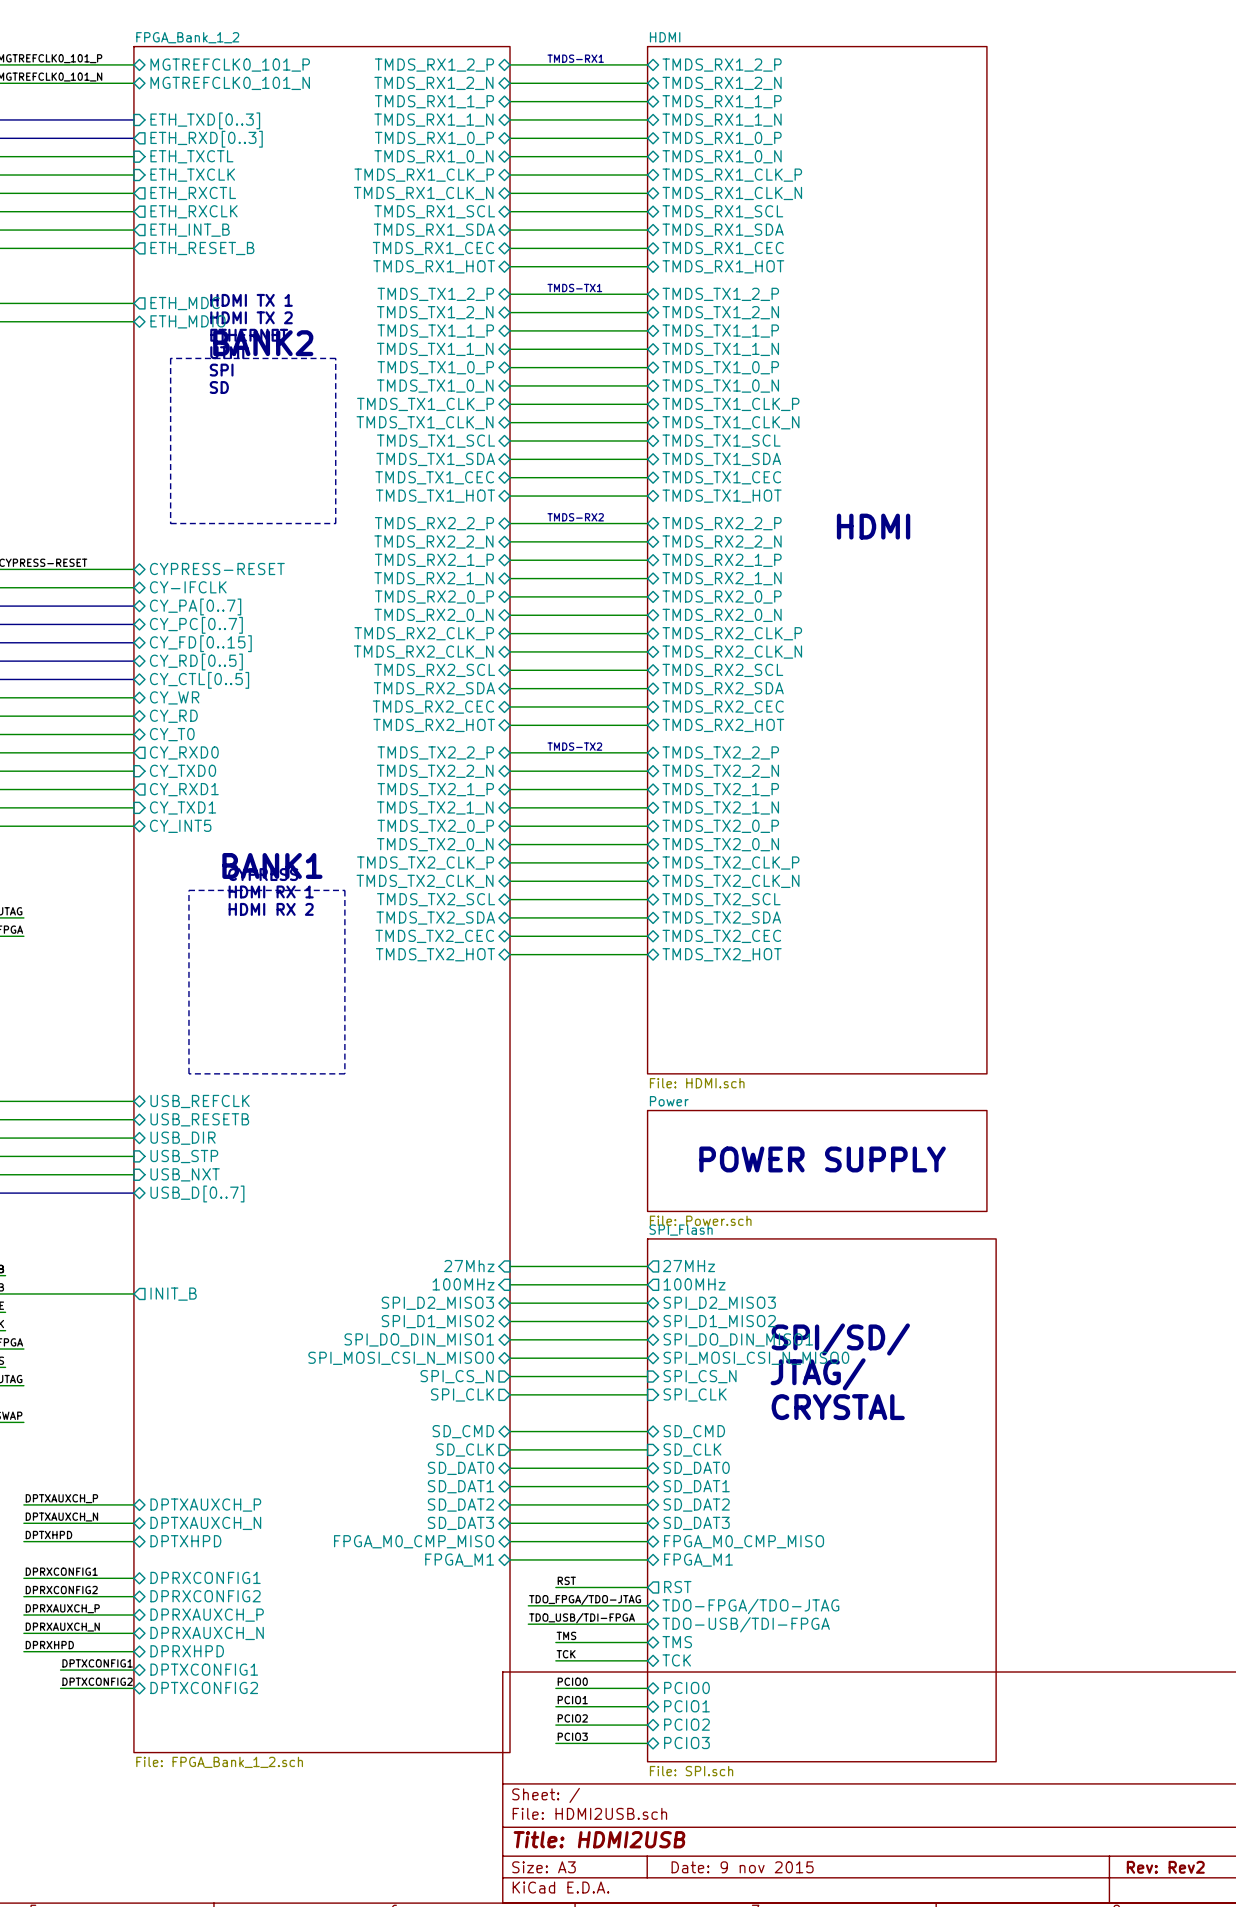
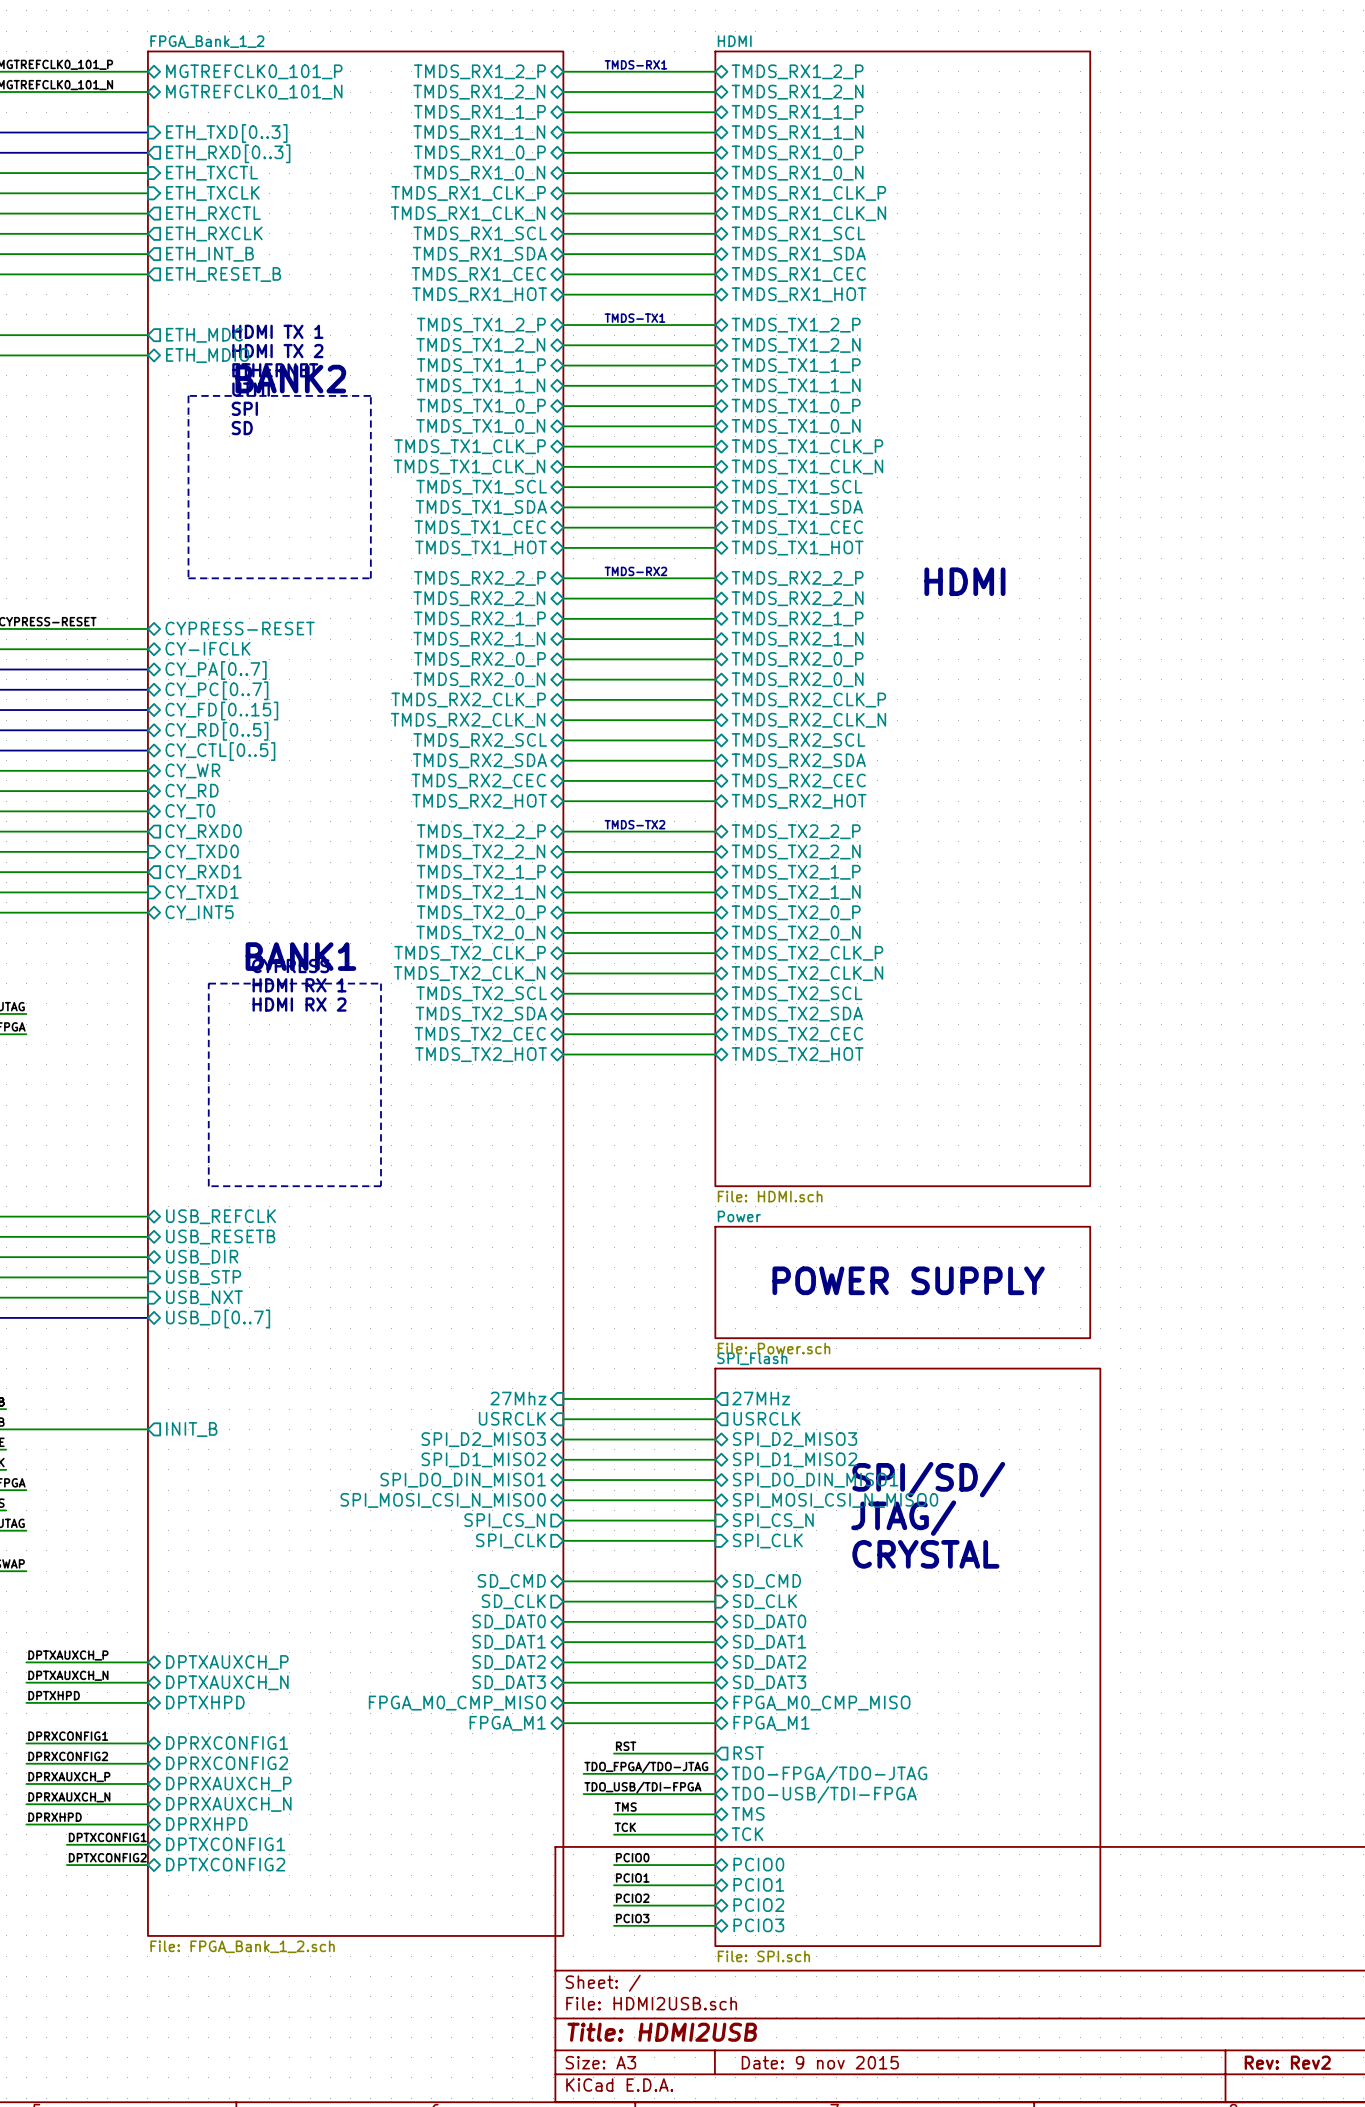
sheet pin: 100MHz (463, 1284) -> USRCLK (512, 1418)
sheet pin: 100MHz (694, 1284) -> USRCLK (766, 1418)

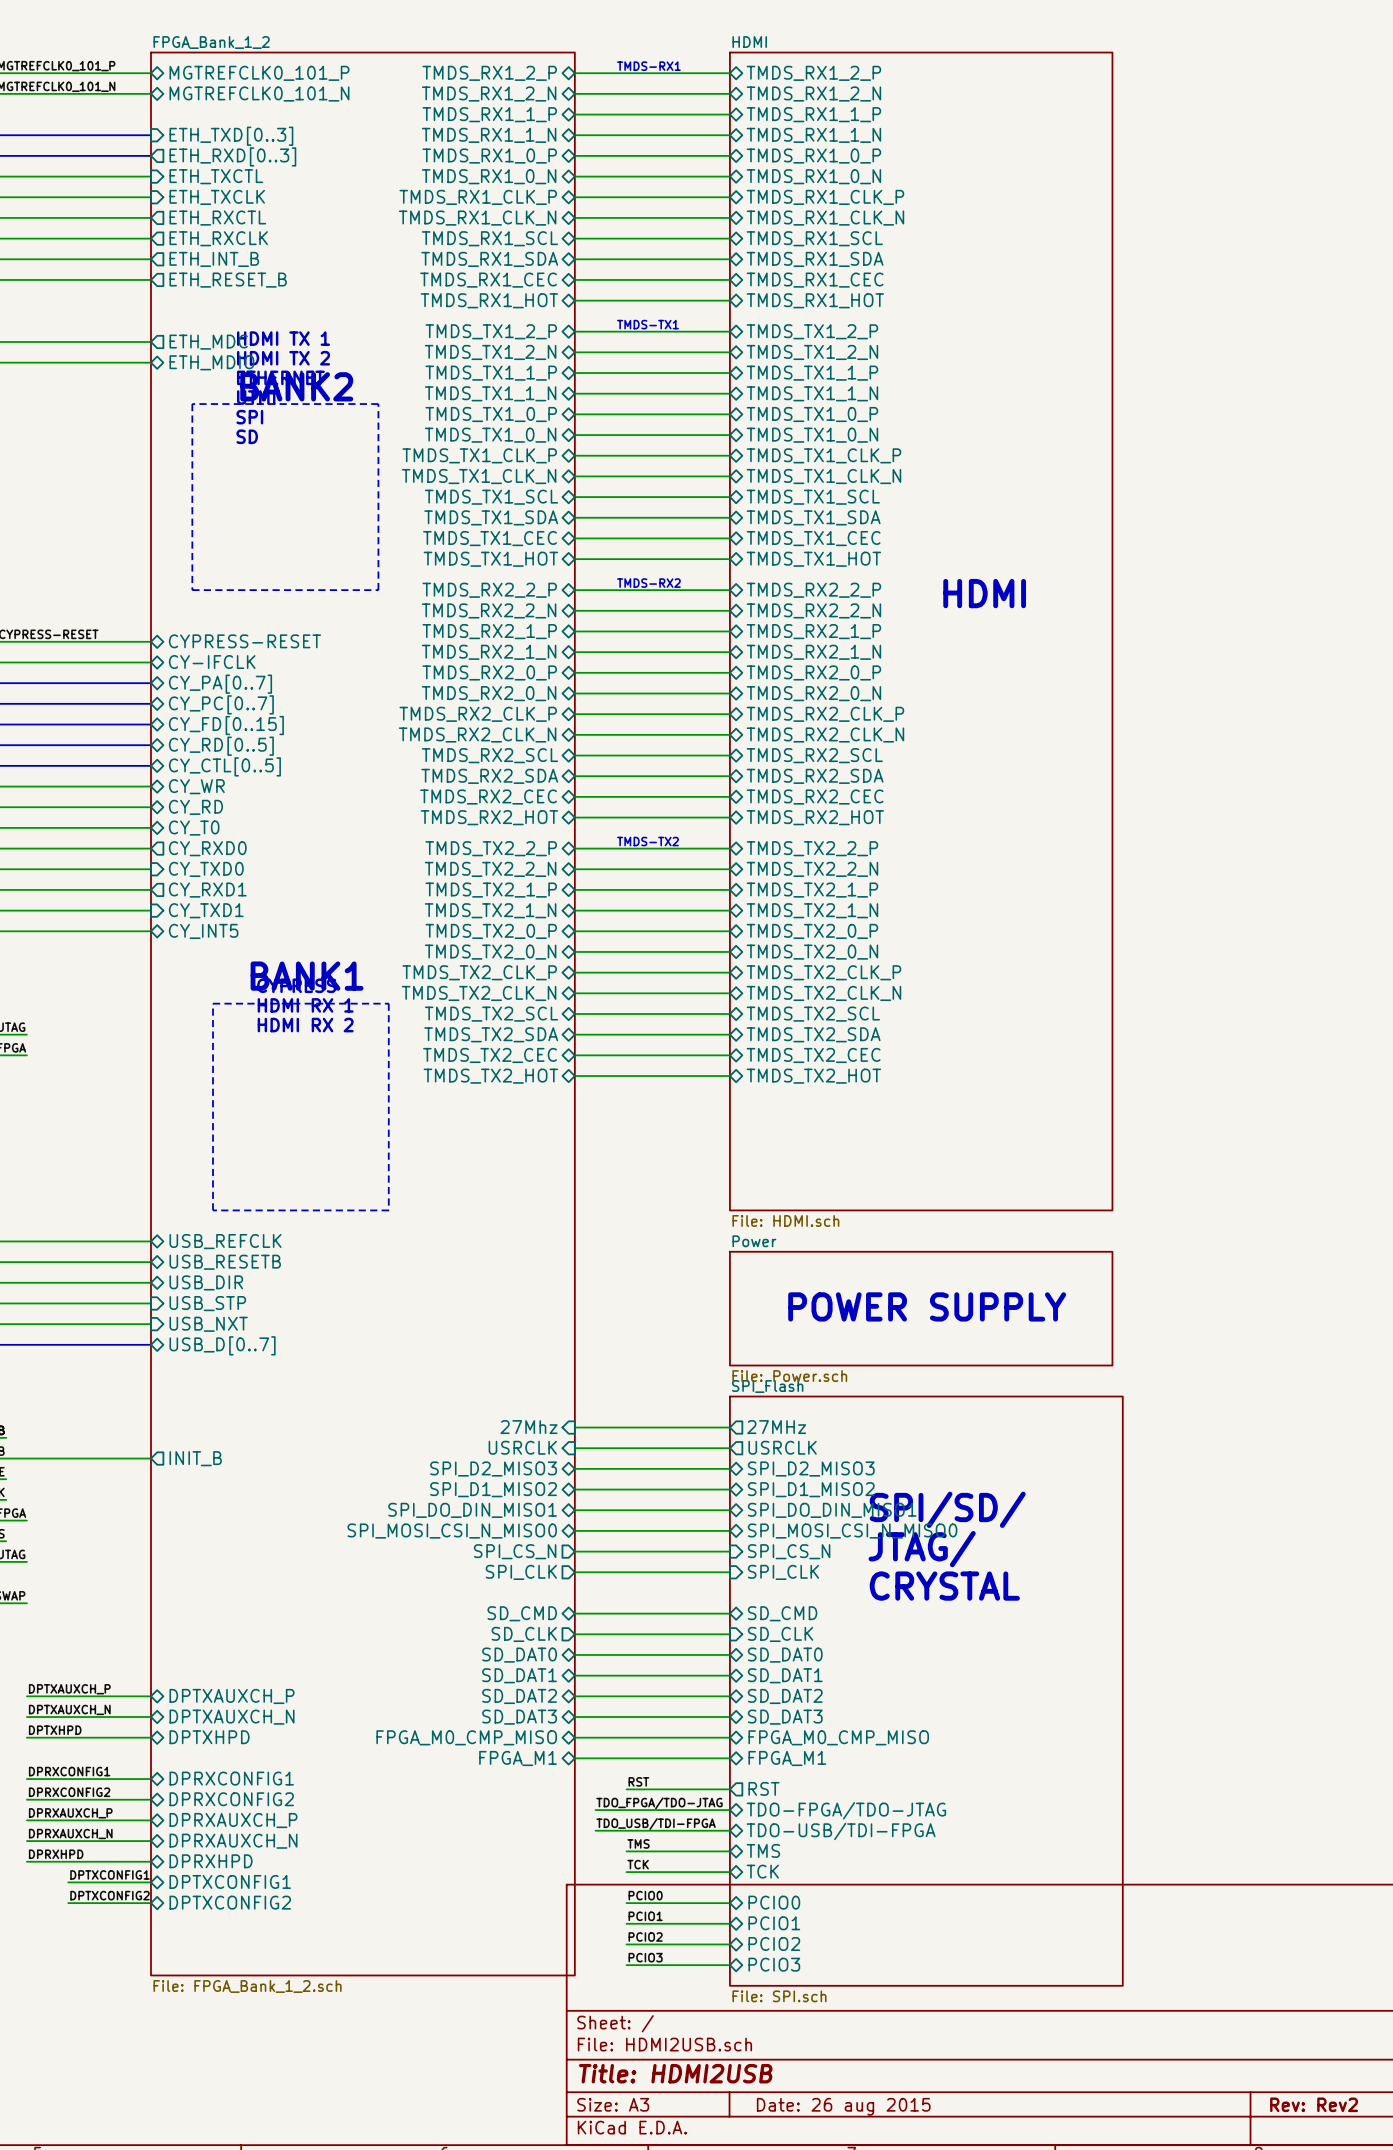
title block: Date: 9 nov 2015 (820, 2062) -> Date: 26 aug 2015 (843, 2106)

